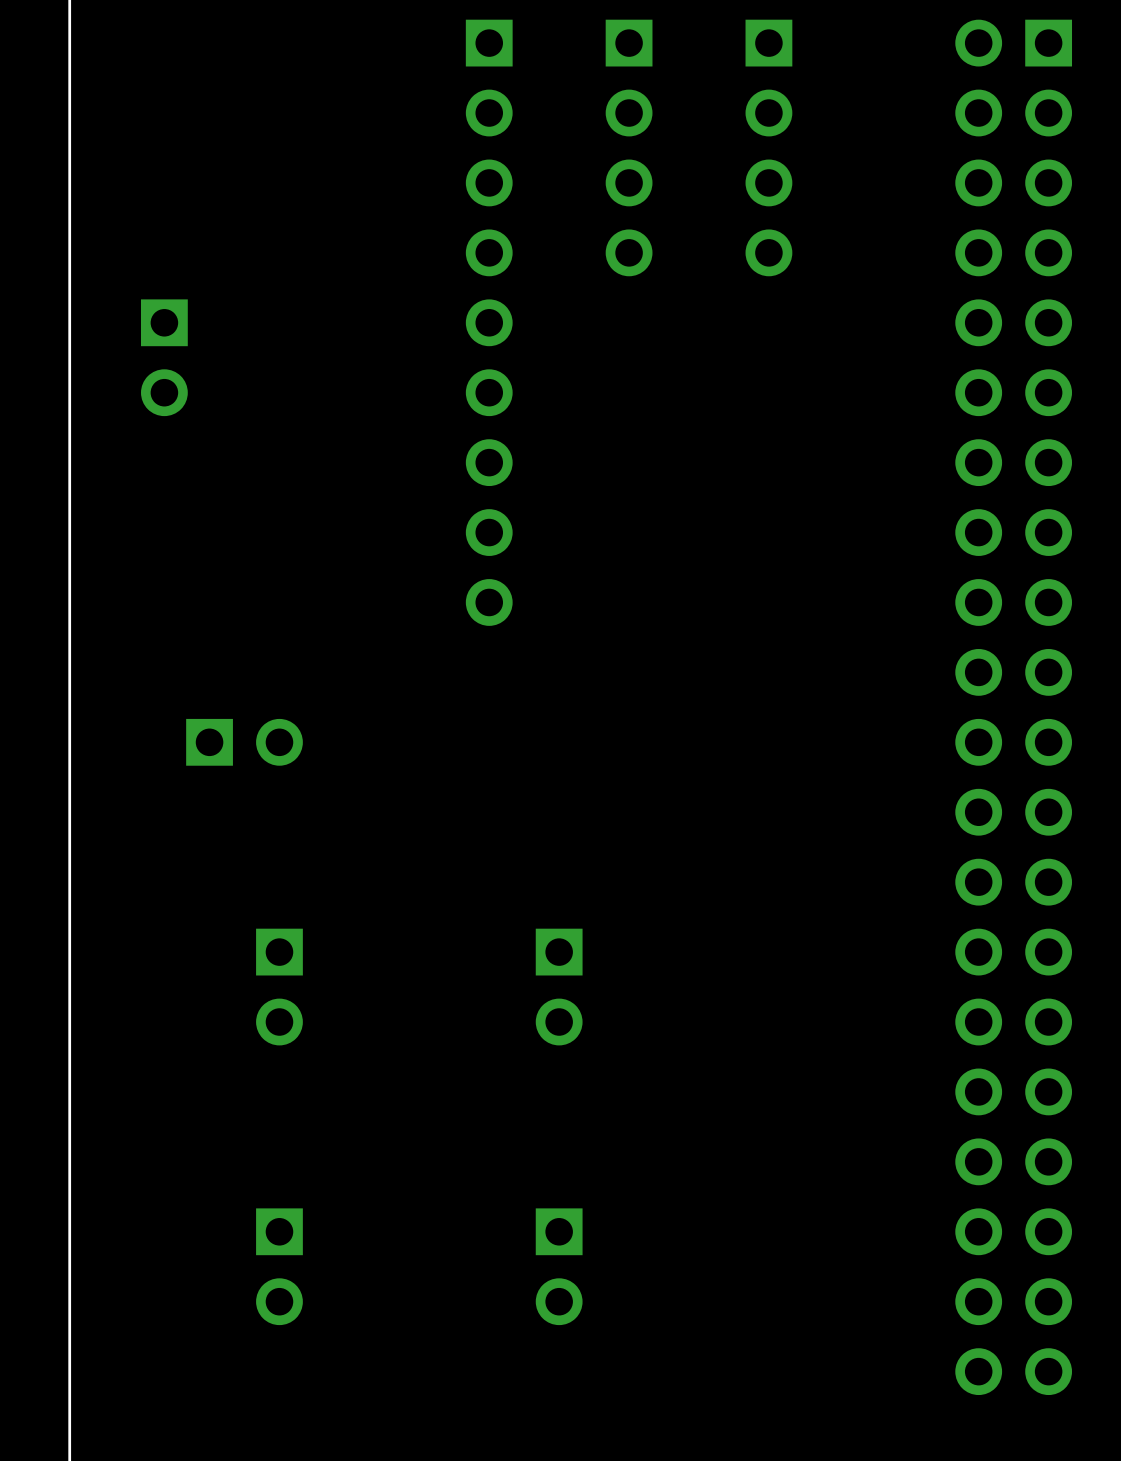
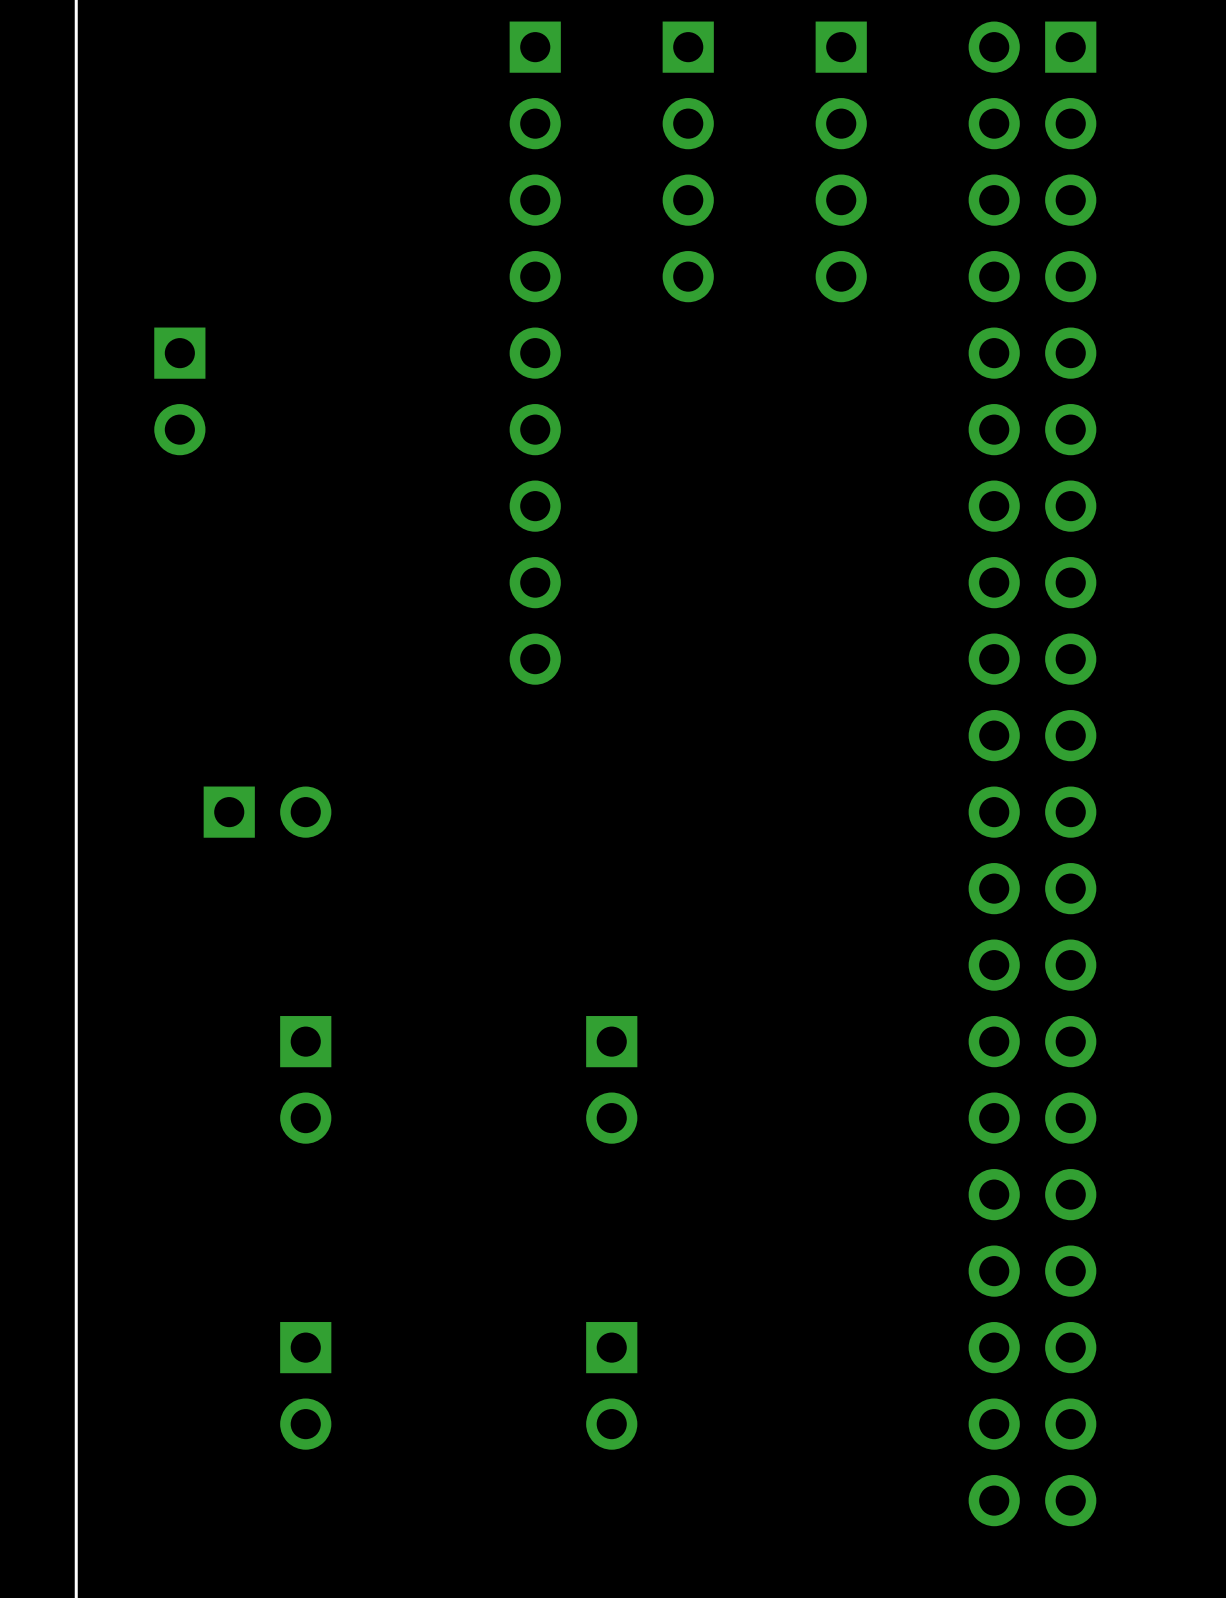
part position: (1013, 707) -> (1032, 773)

